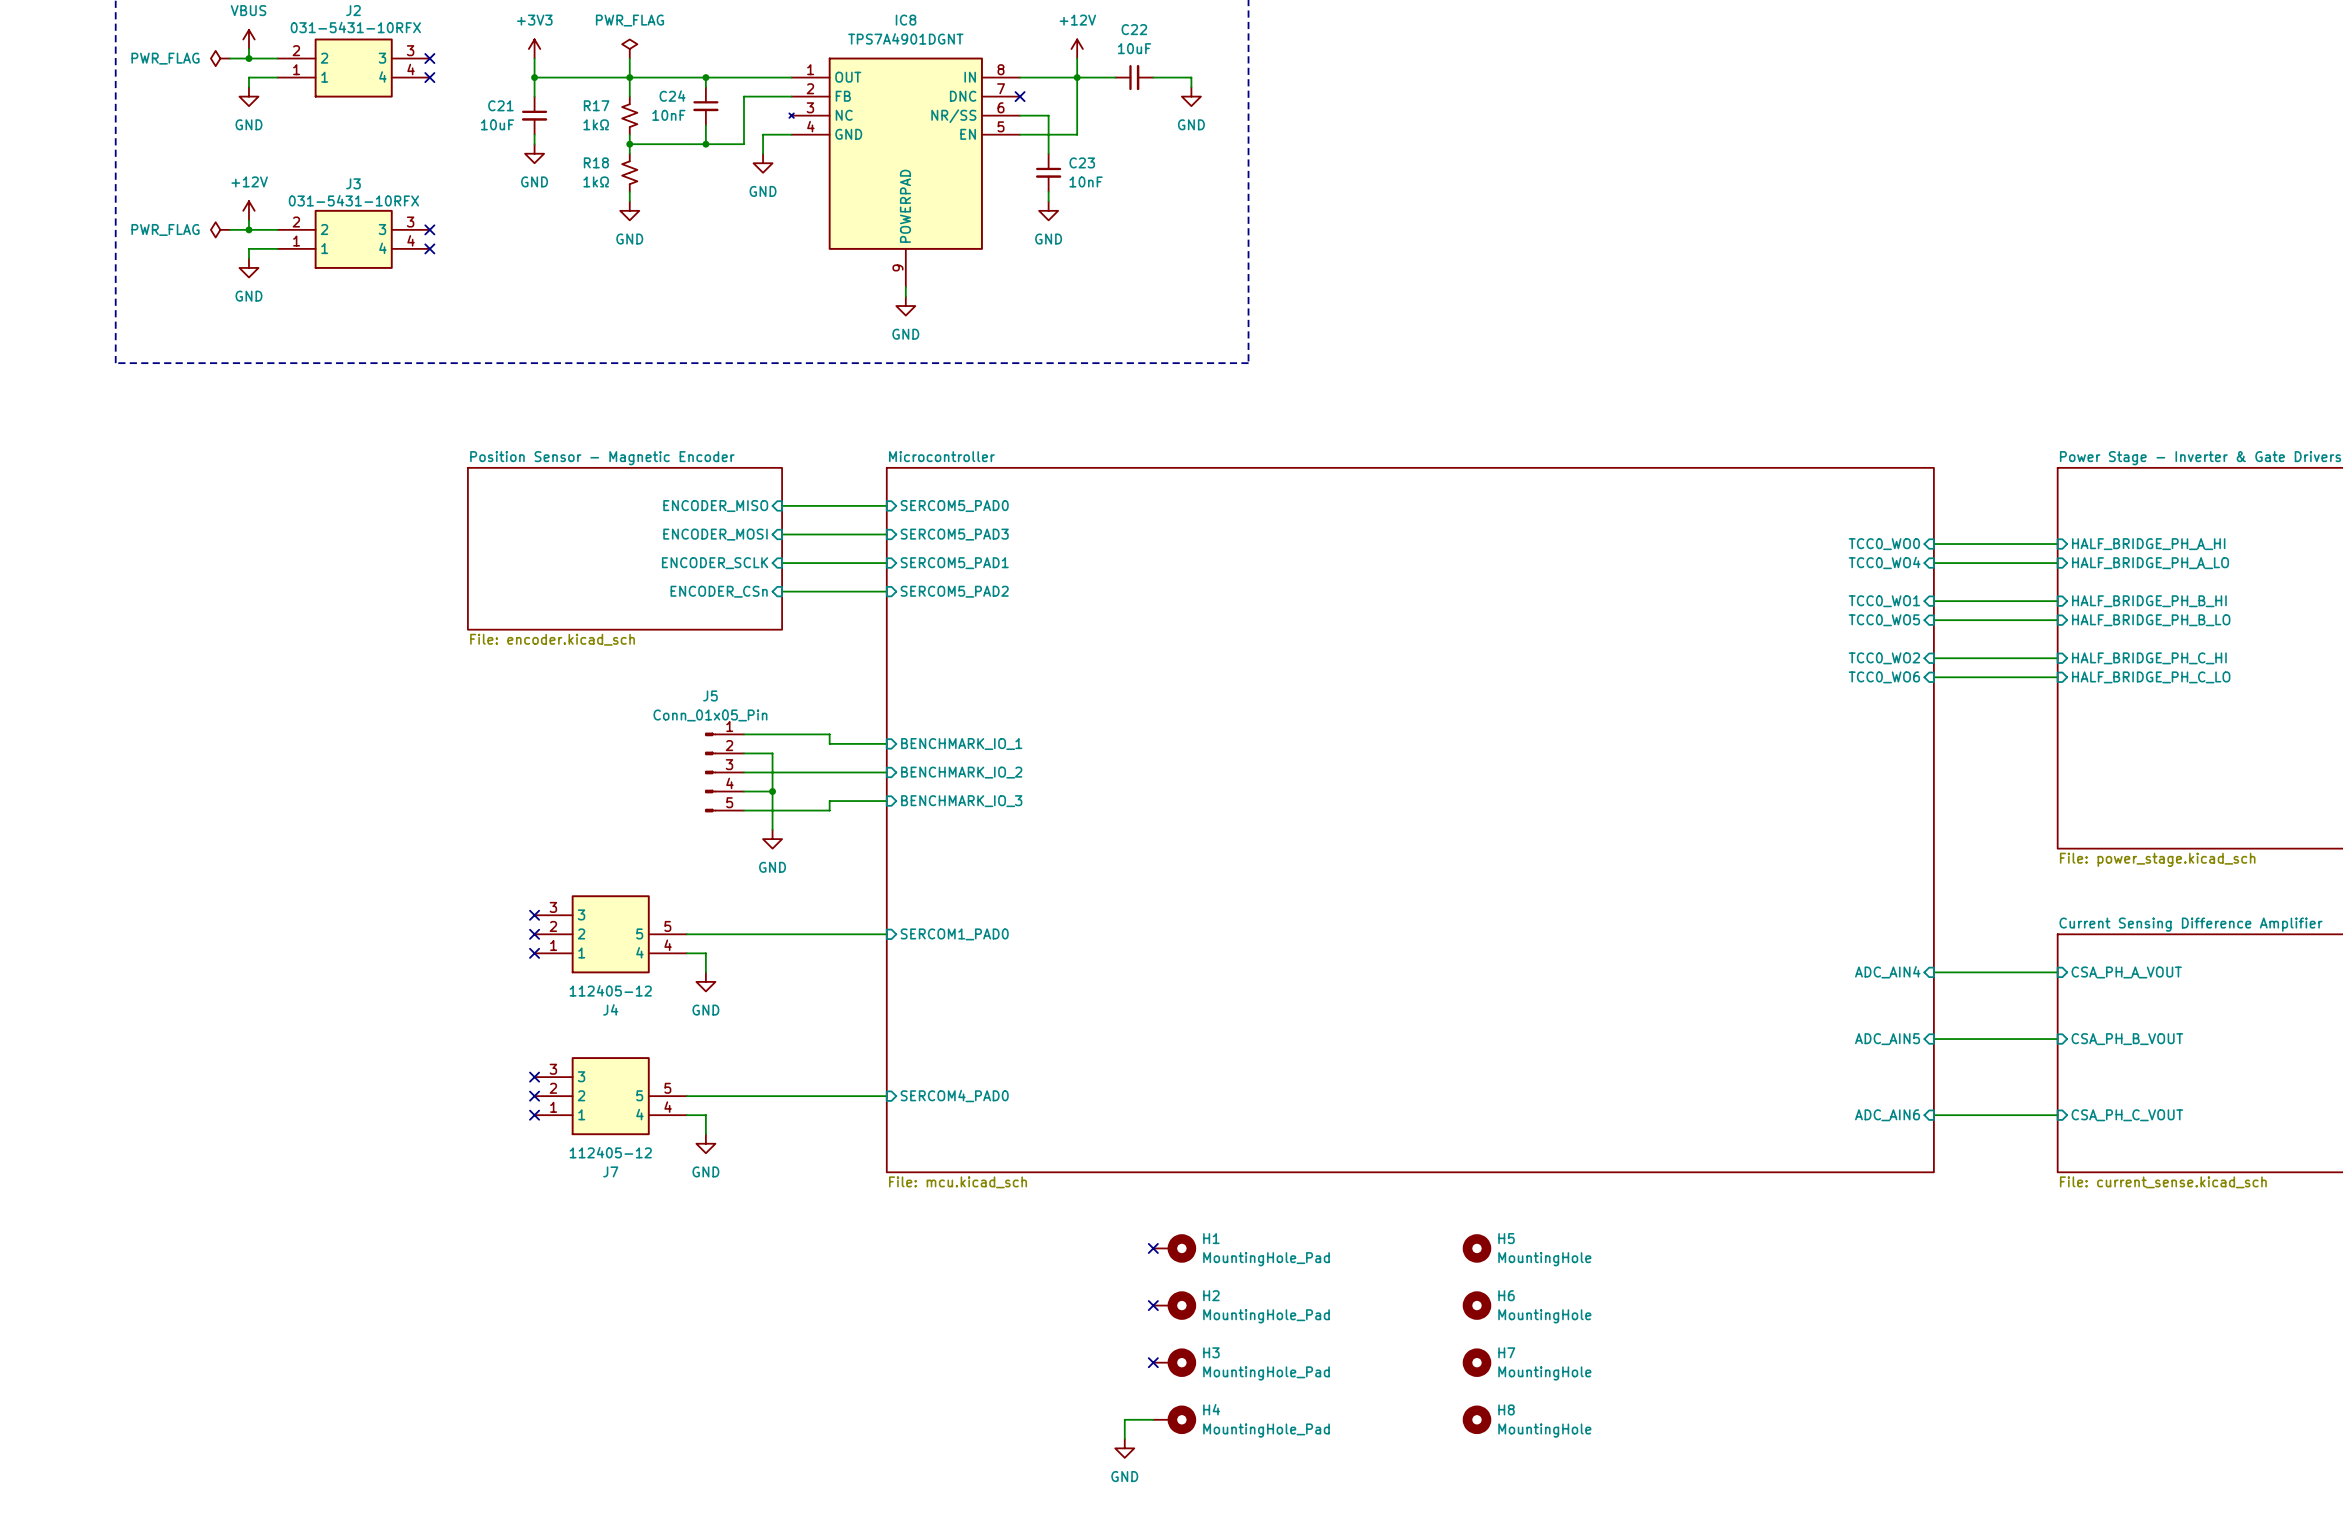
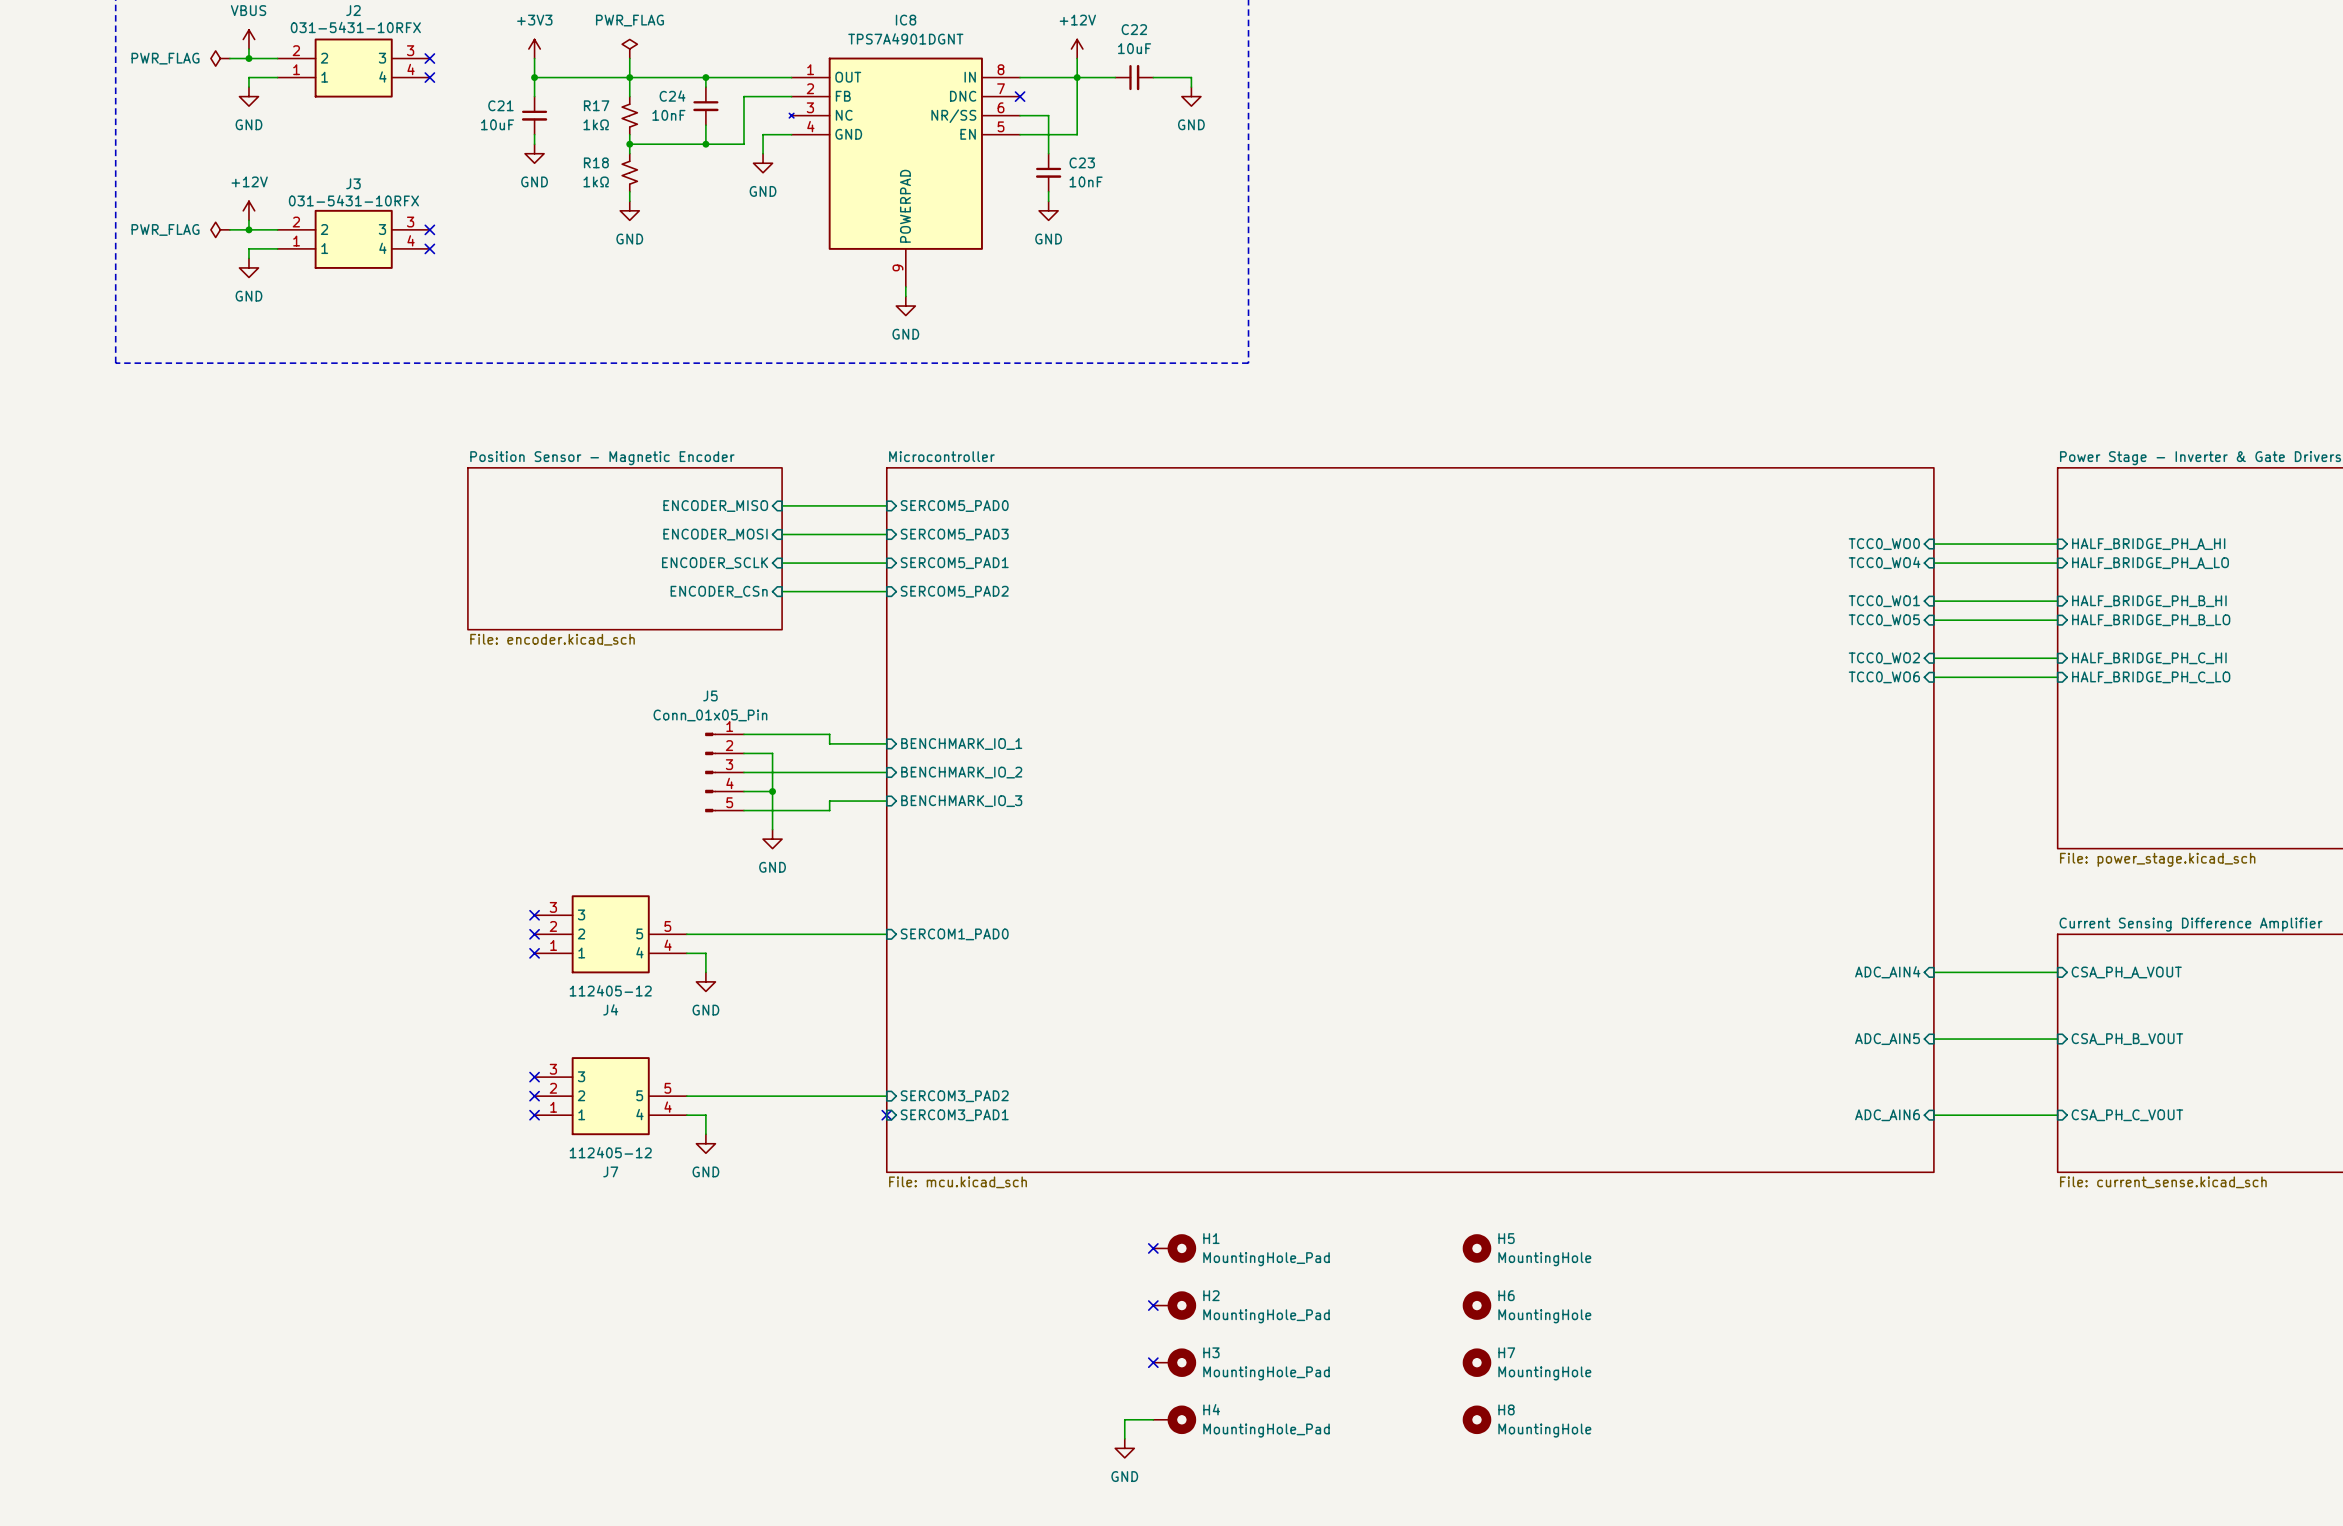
sheet pin: SERCOM4_PAD0 (954, 1096) -> SERCOM3_PAD2 (954, 1096)
no-connect mark: none -> (886, 1115)
sheet pin: none -> SERCOM3_PAD1 (954, 1115)

